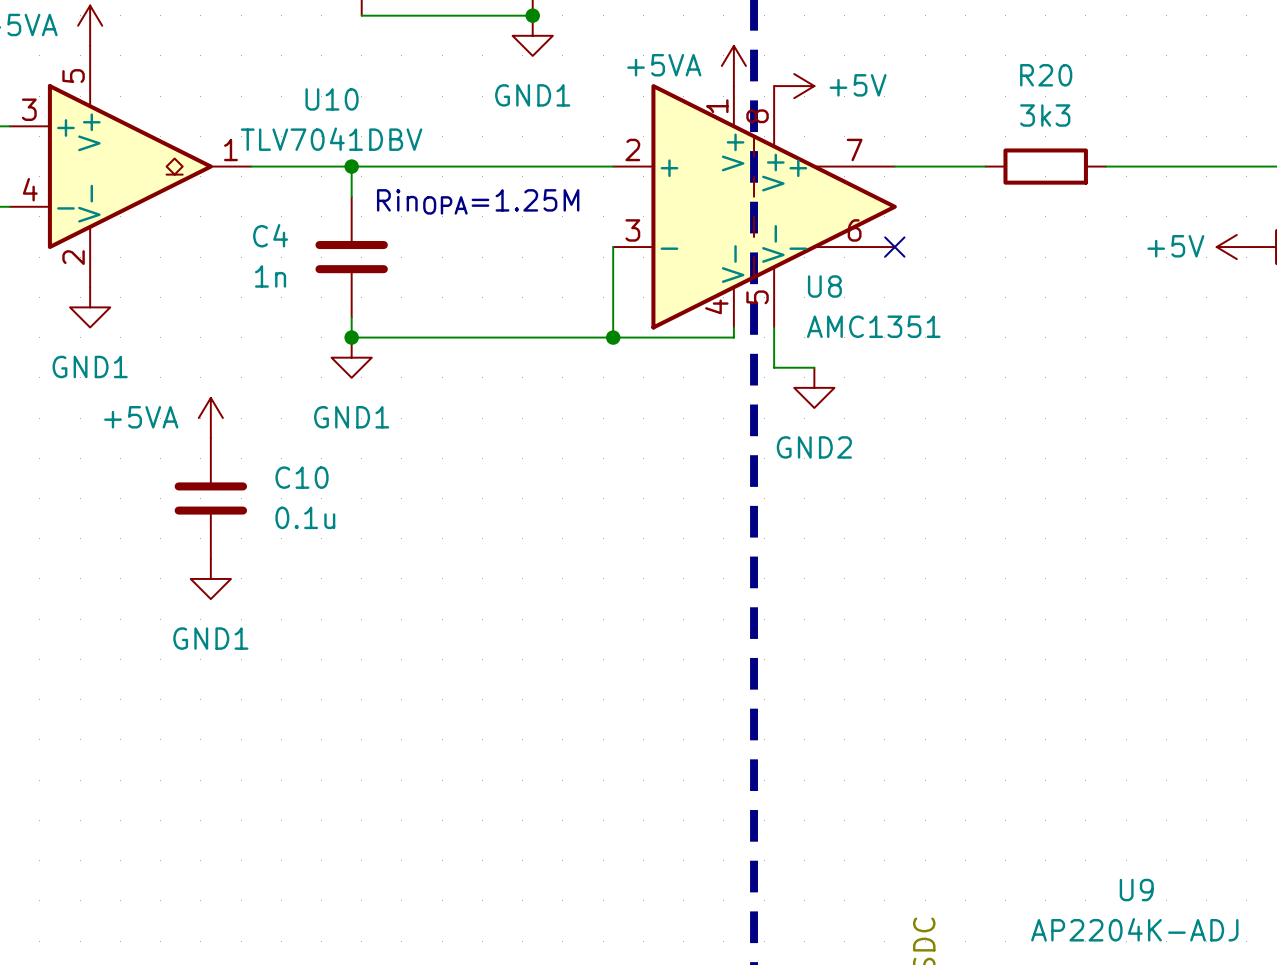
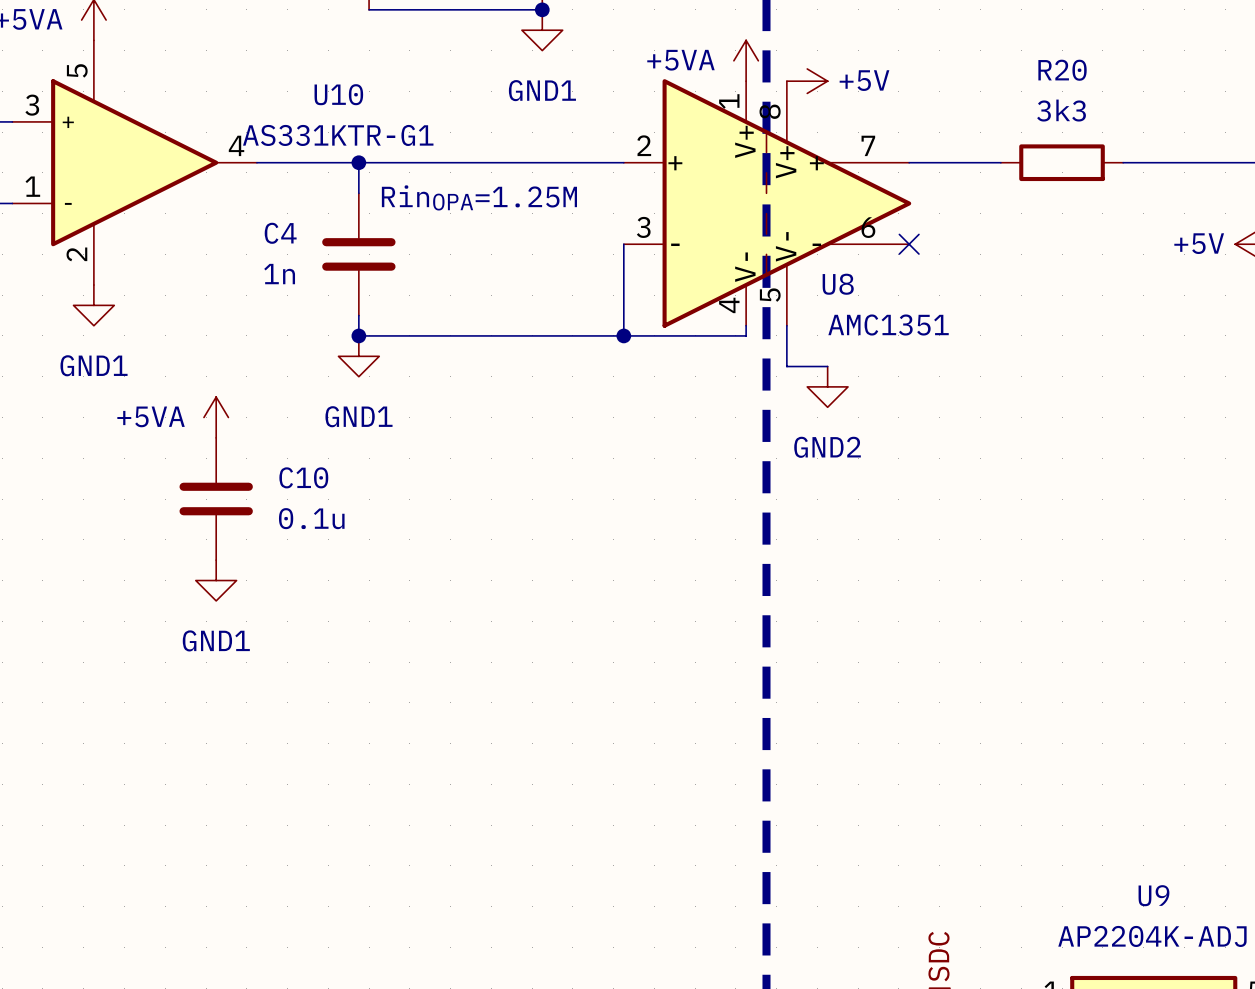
U10 symbol: [9, 45, 252, 288] -> [12, 40, 257, 286]
U10 value: TLV7041DBV (331, 139) -> AS331KTR-G1 (338, 135)

